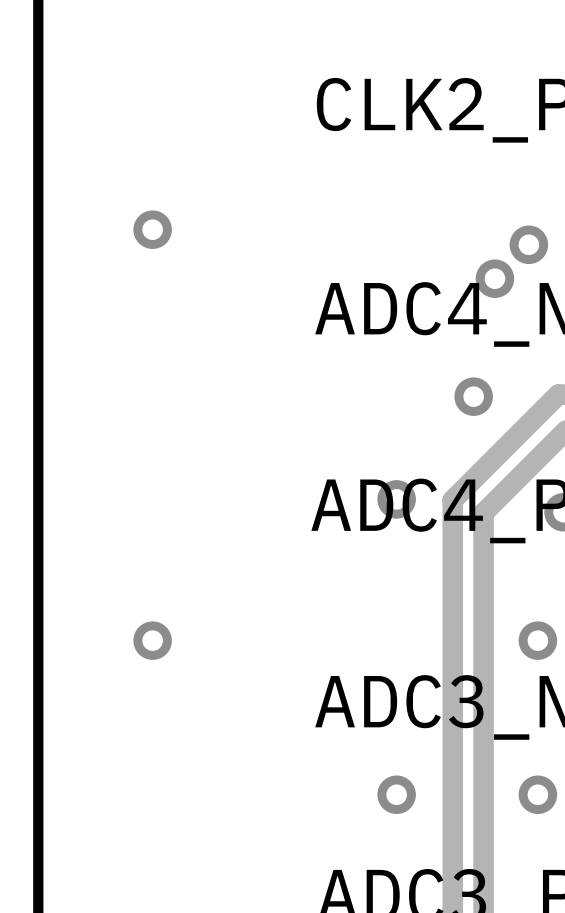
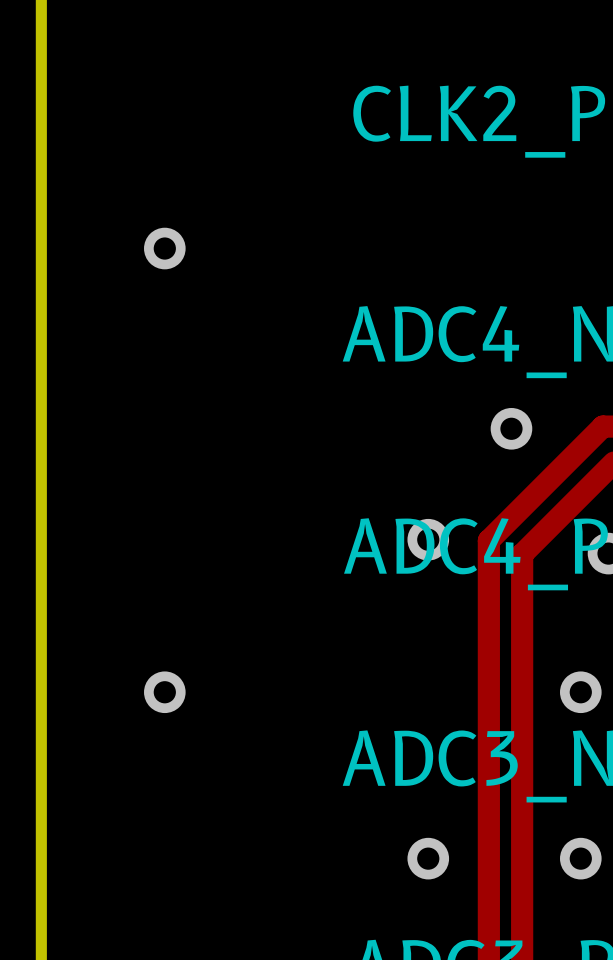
via: (528, 244) -> none
via: (494, 278) -> none

